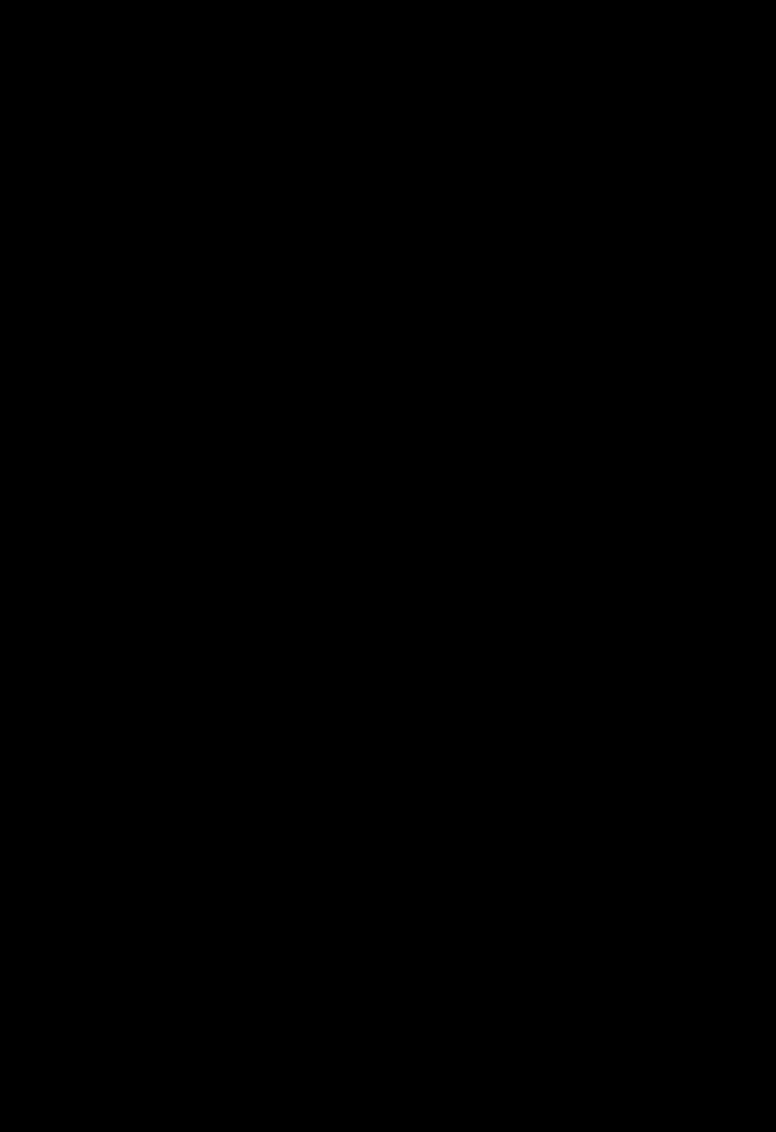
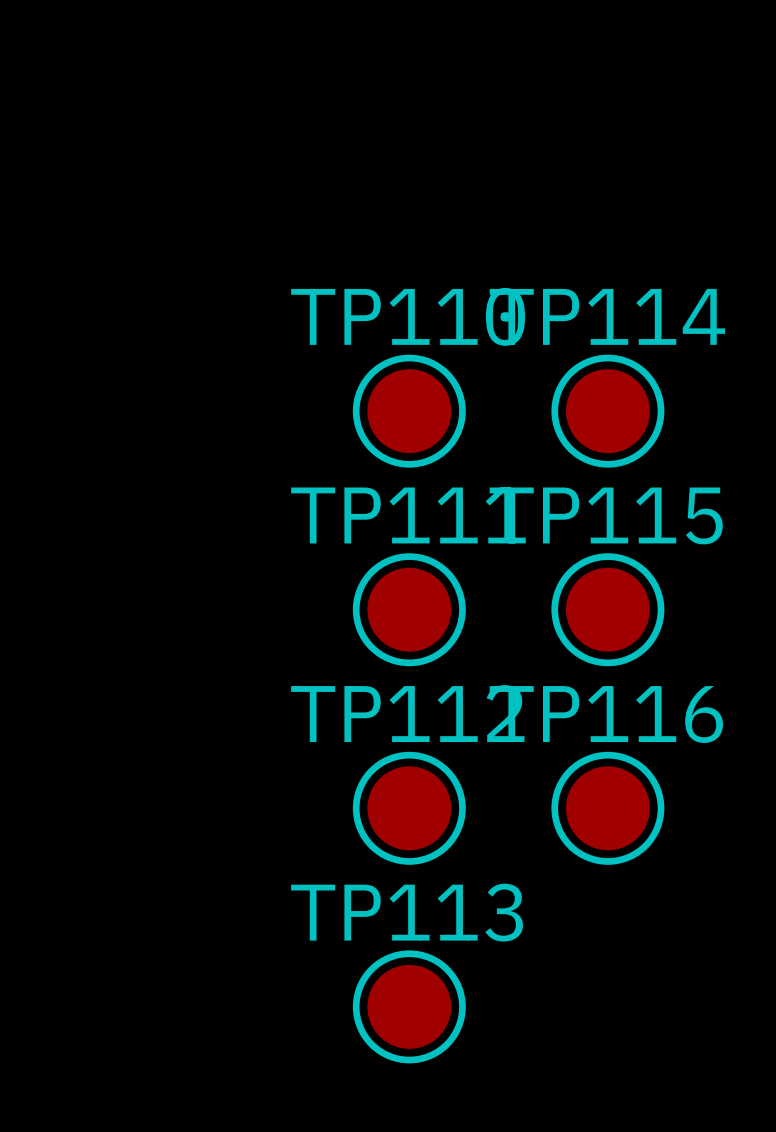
TP110: none -> (409, 411)
TP114: none -> (607, 411)
TP111: none -> (409, 609)
TP115: none -> (607, 609)
TP112: none -> (409, 808)
TP116: none -> (607, 808)
TP113: none -> (409, 1006)

